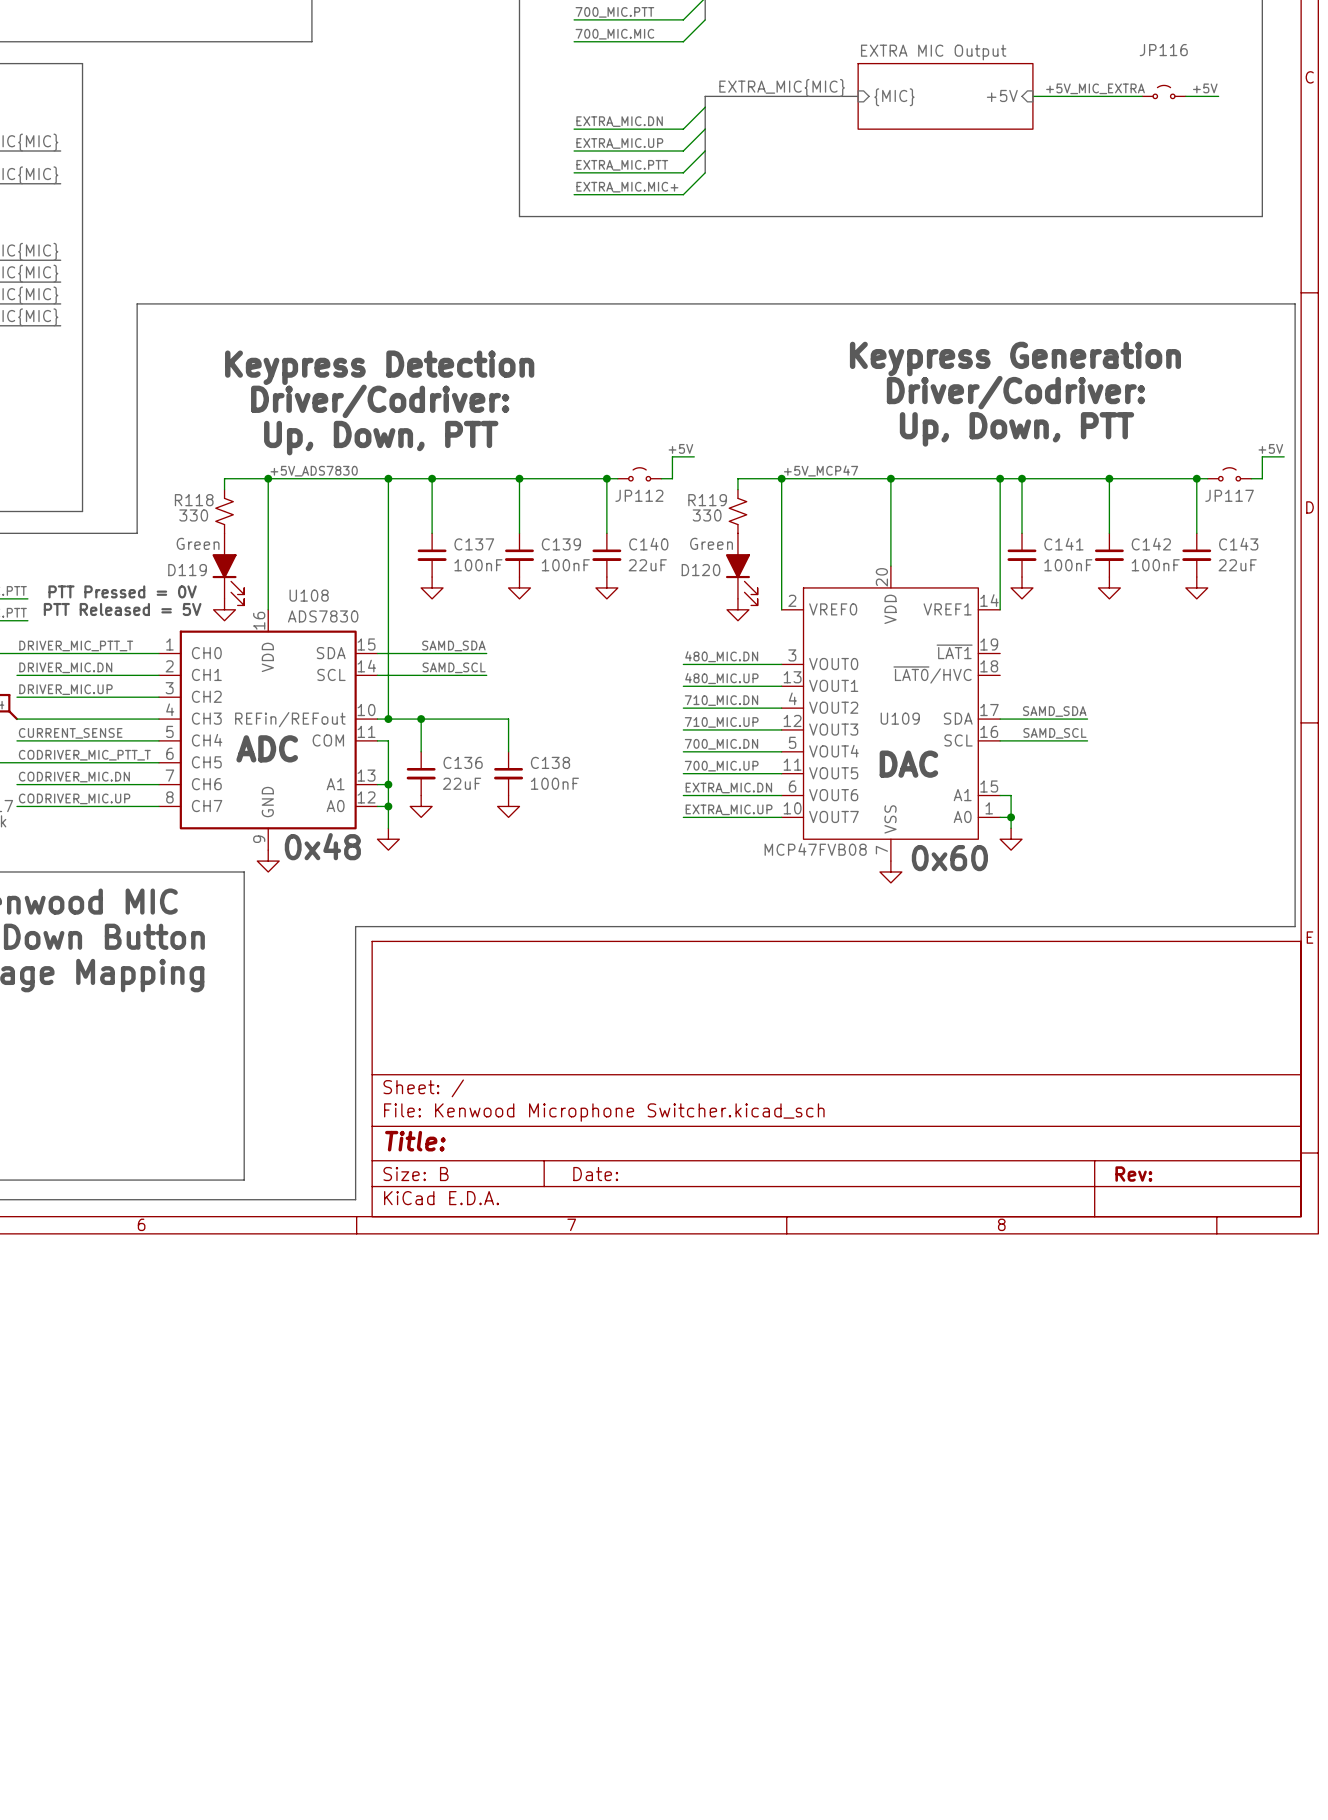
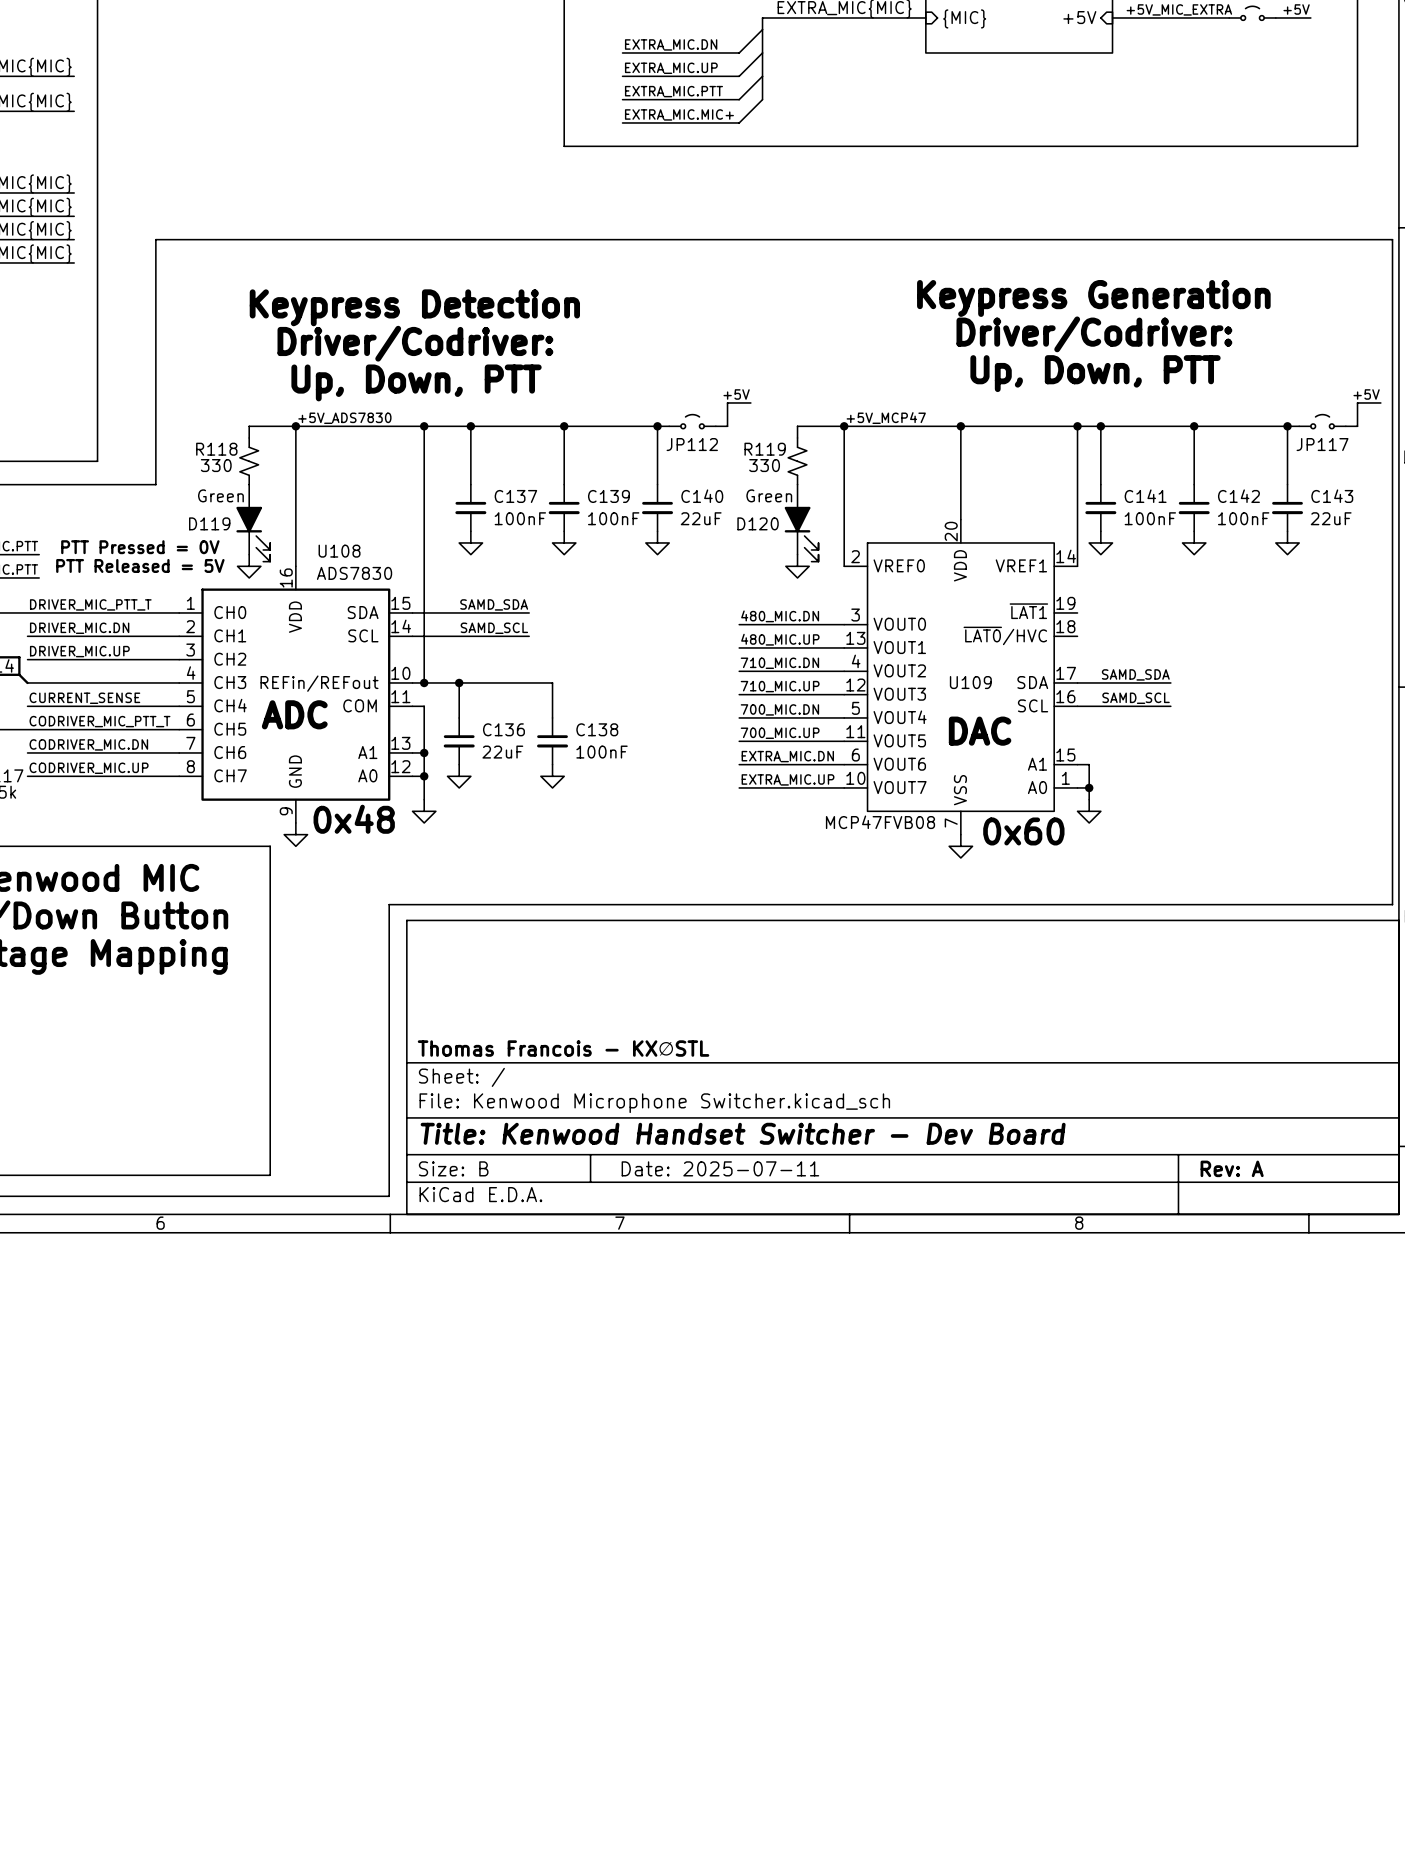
title block: none -> Thomas Francois - KX∅STL (563, 1048)
title block: Title: (415, 1141) -> Title: Kenwood Handset Switcher - Dev Board (743, 1133)
title block: Date: (595, 1174) -> Date: 2025-07-11 (720, 1168)
title block: Rev: (1133, 1174) -> Rev: A (1232, 1168)

